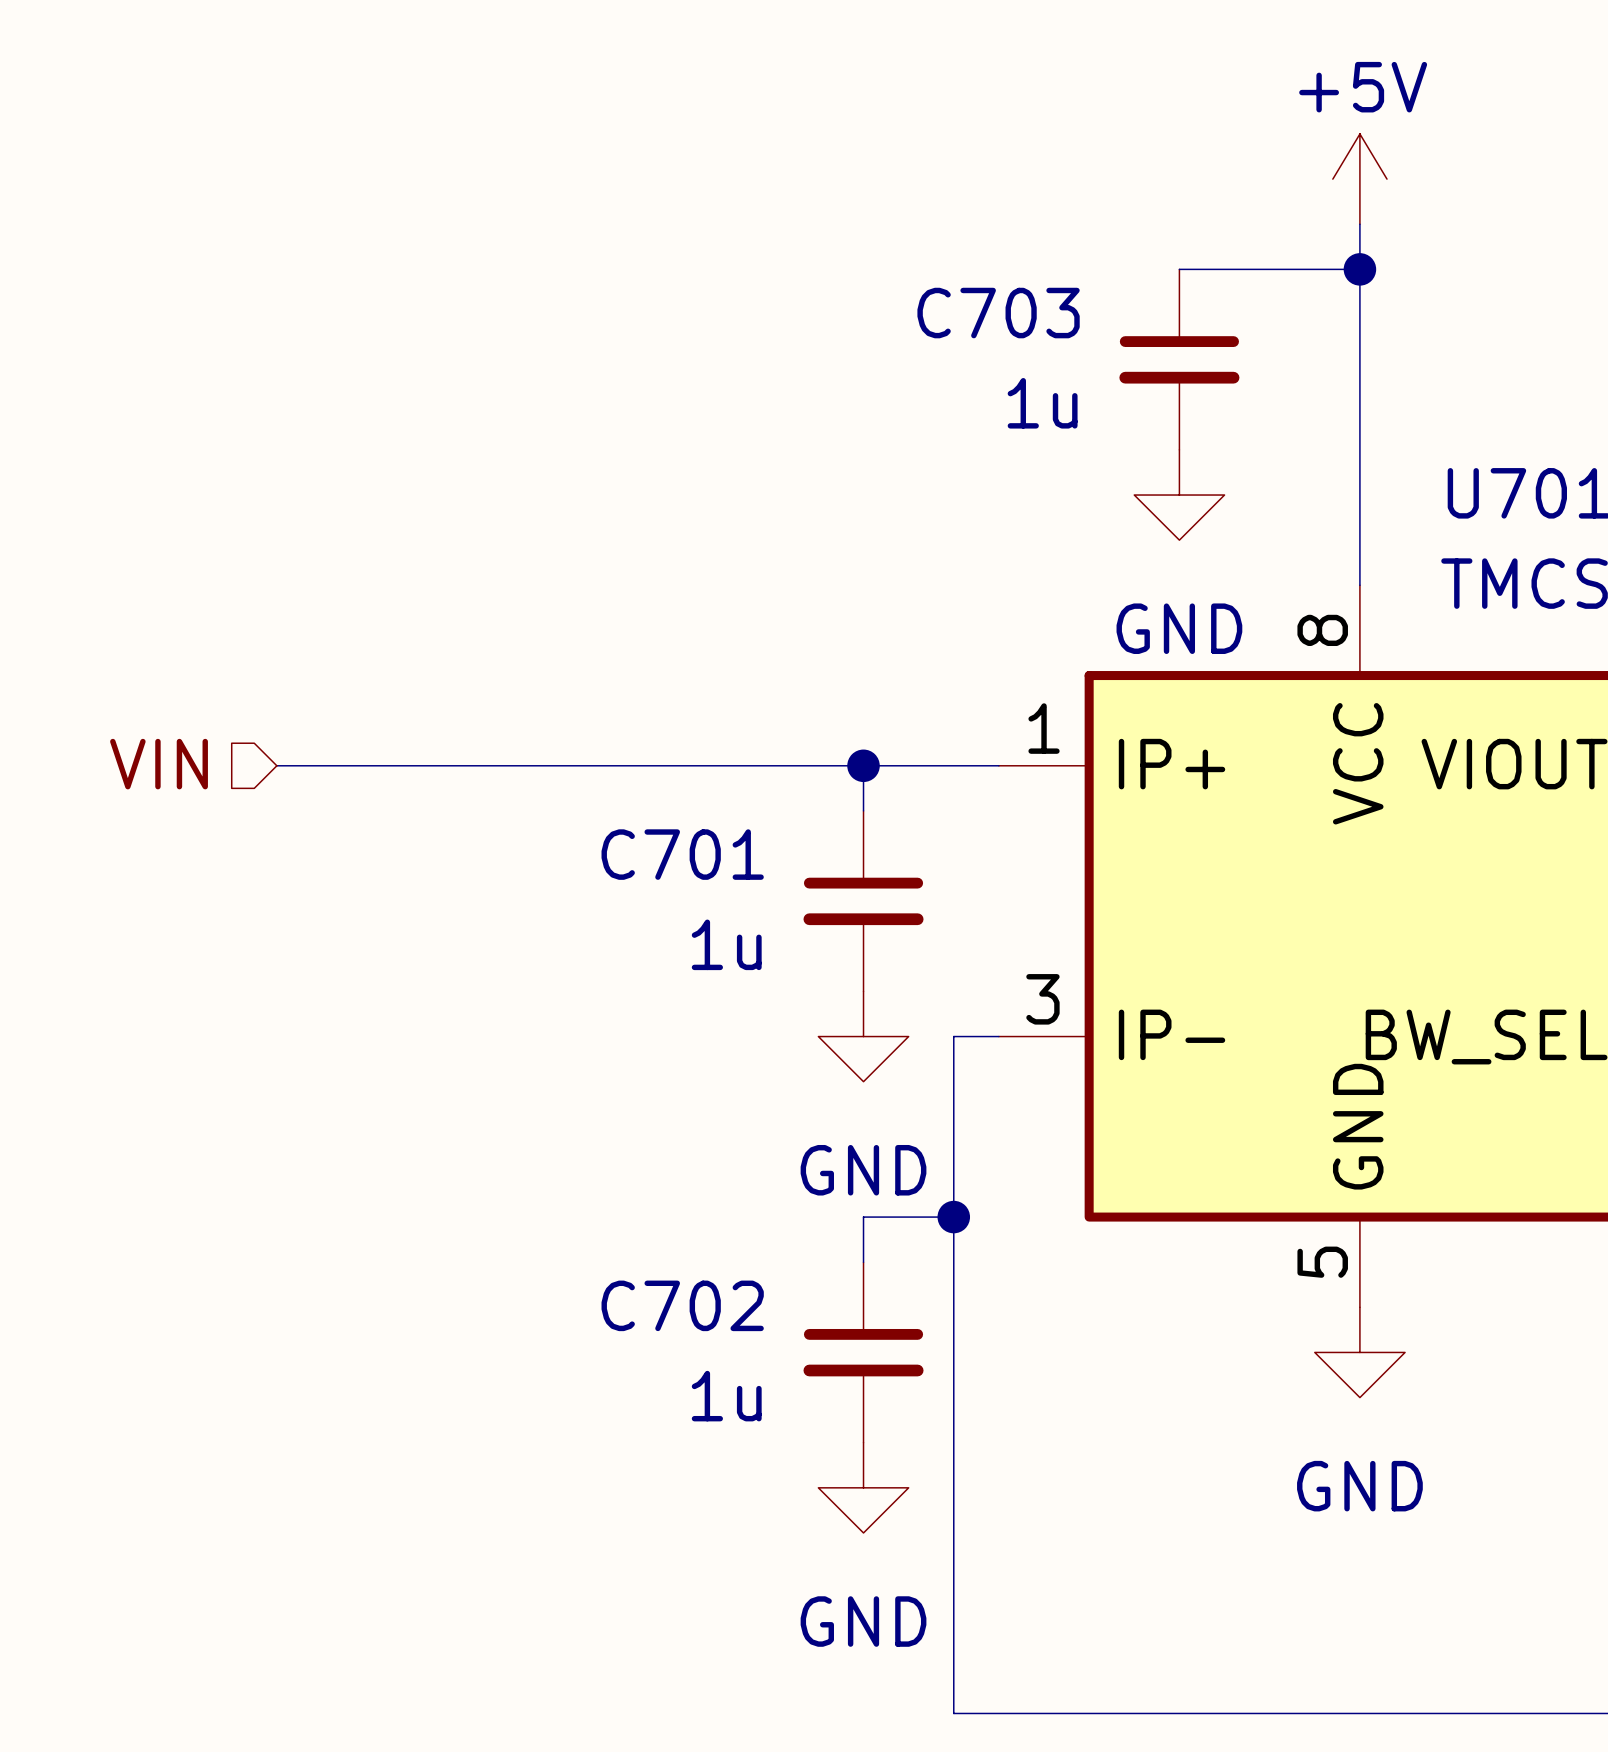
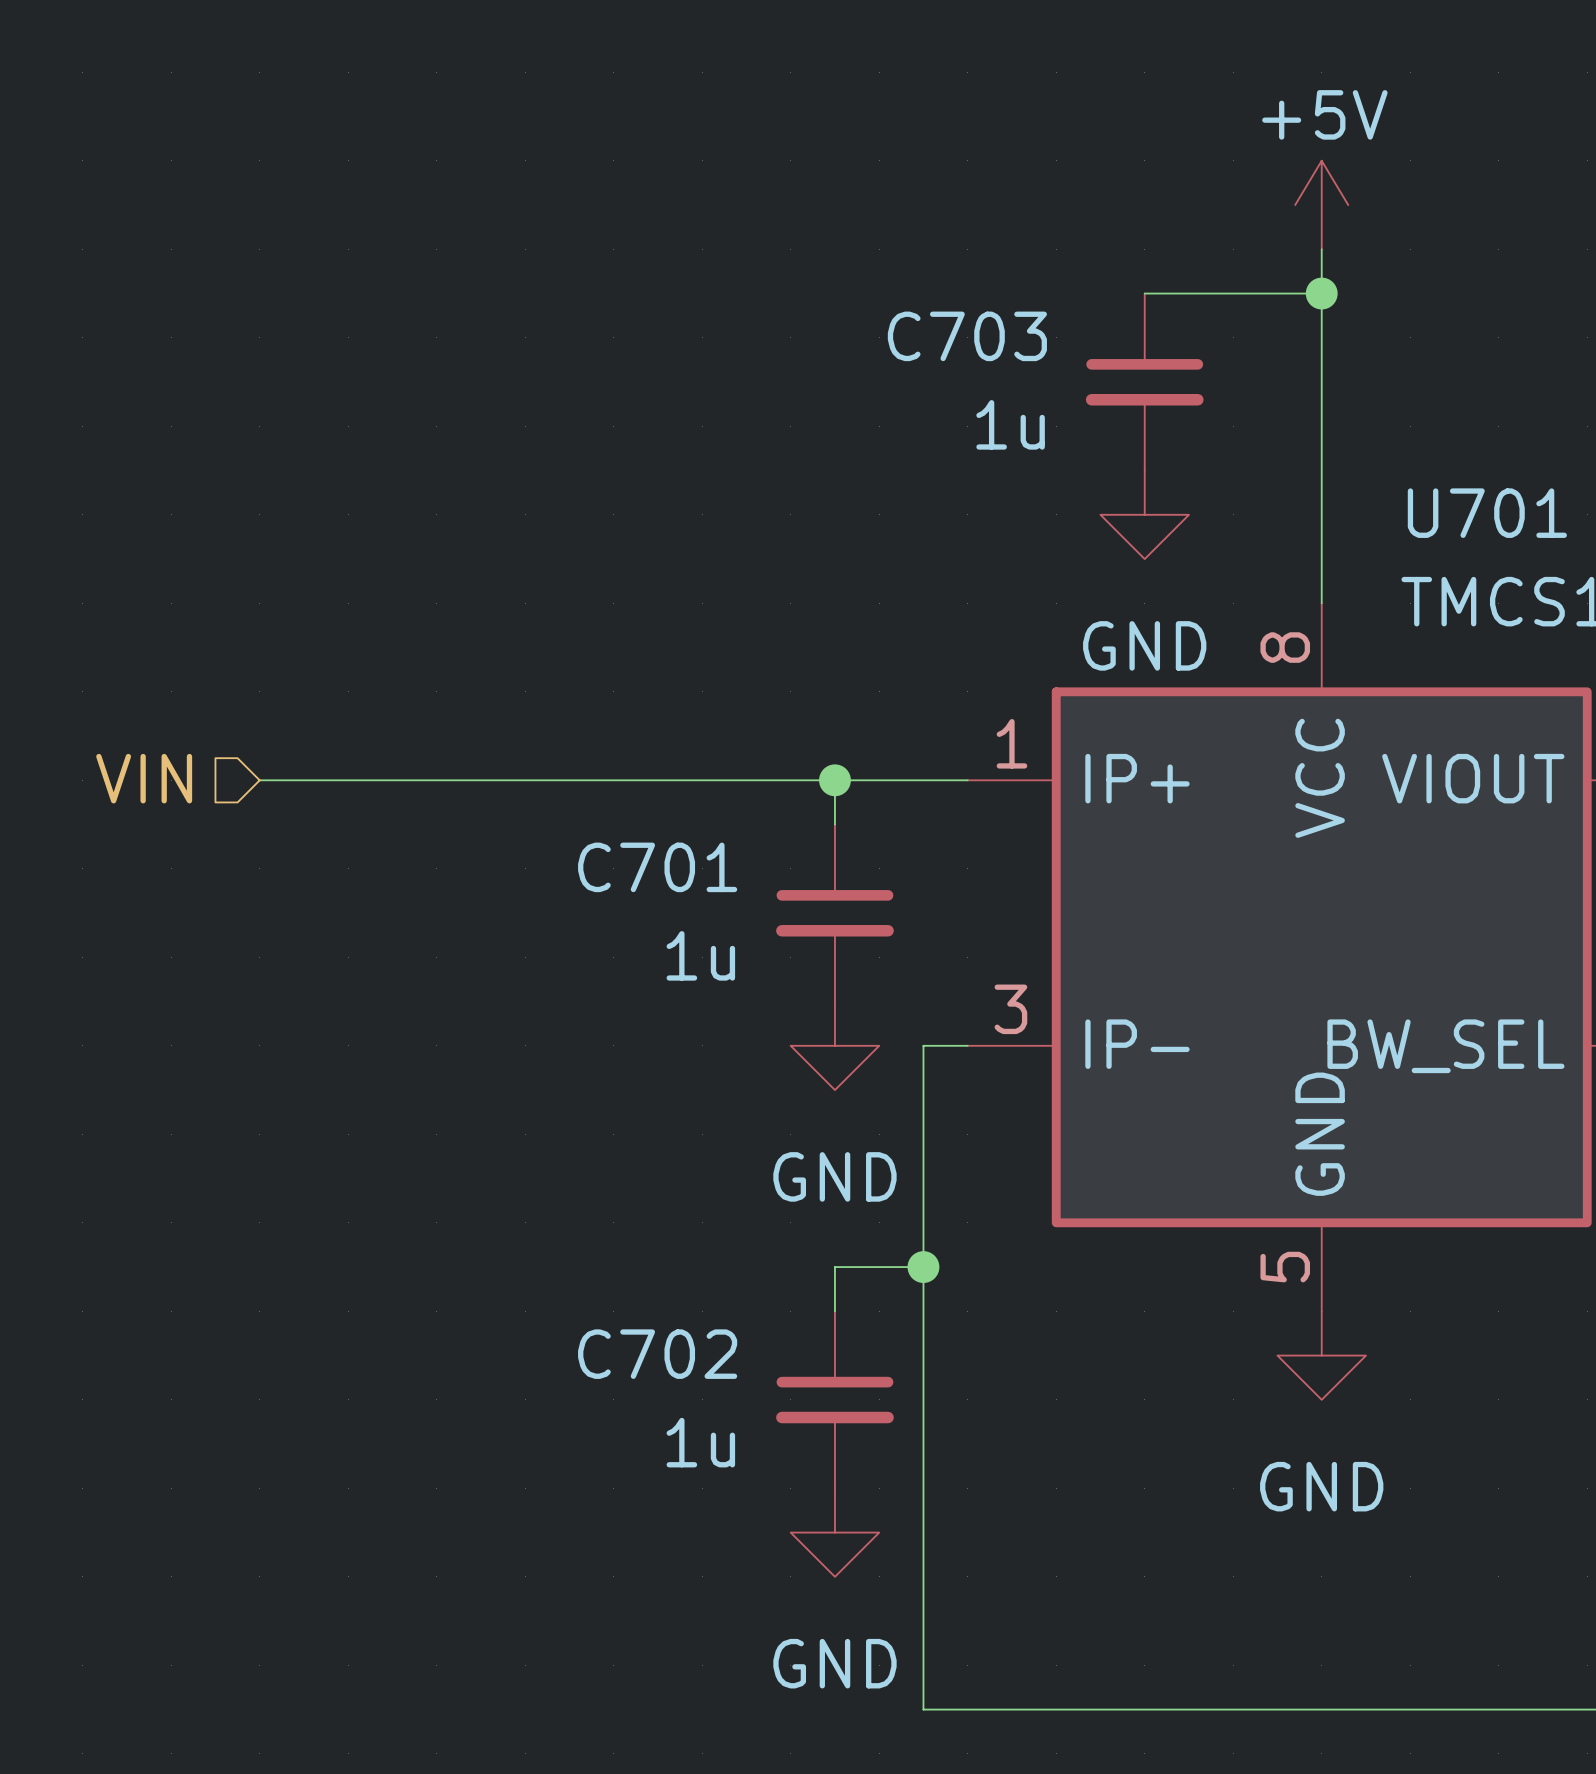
wire: (953, 1217) (863, 1217) (863, 1262) -> (923, 1267) (834, 1267) (834, 1311)
junction position: (953, 1217) -> (923, 1267)
C702 position: (863, 1352) -> (834, 1399)
power symbol position: GND (863, 1487) -> GND (834, 1532)

